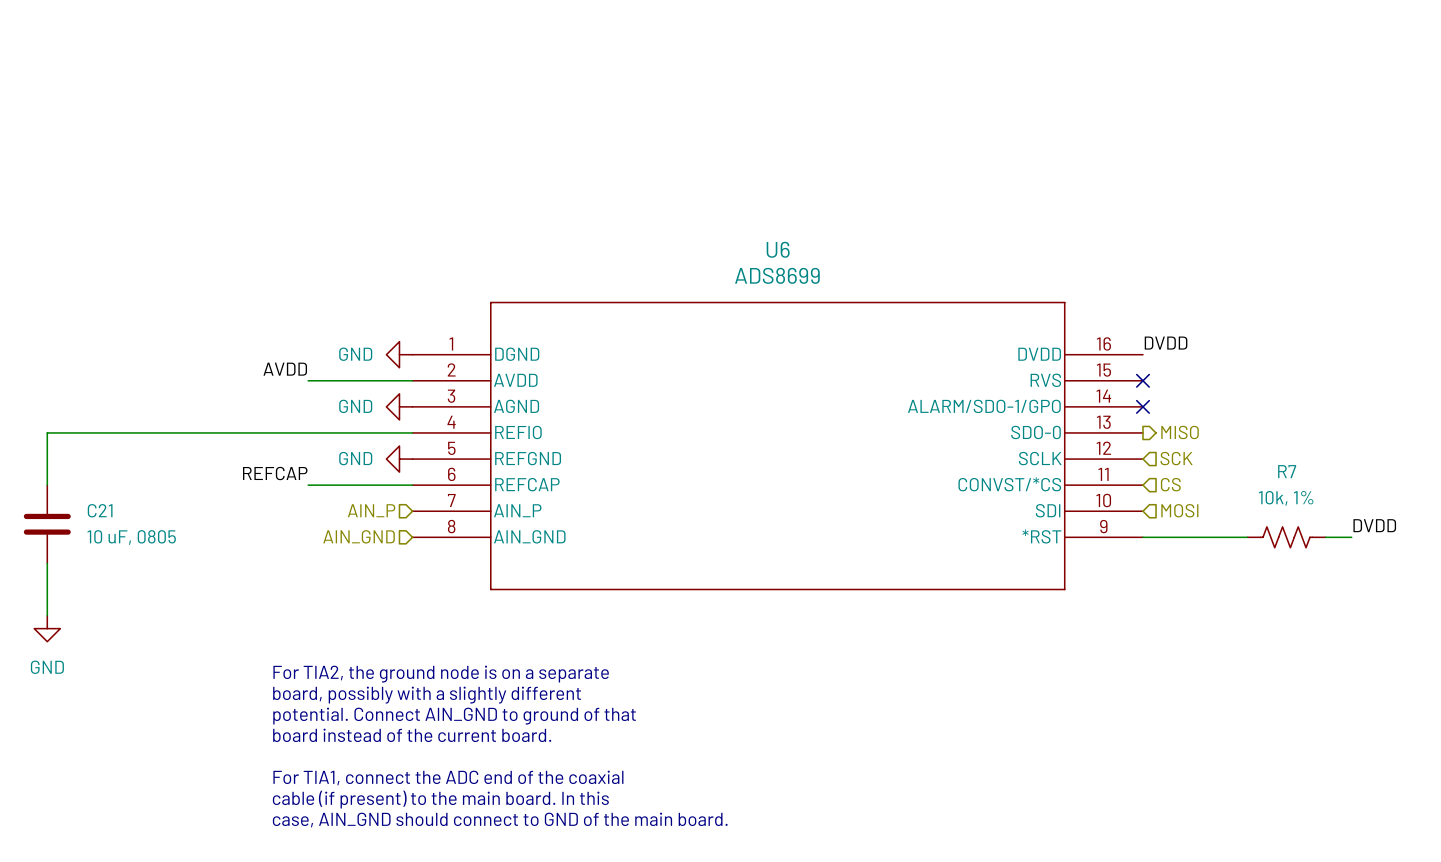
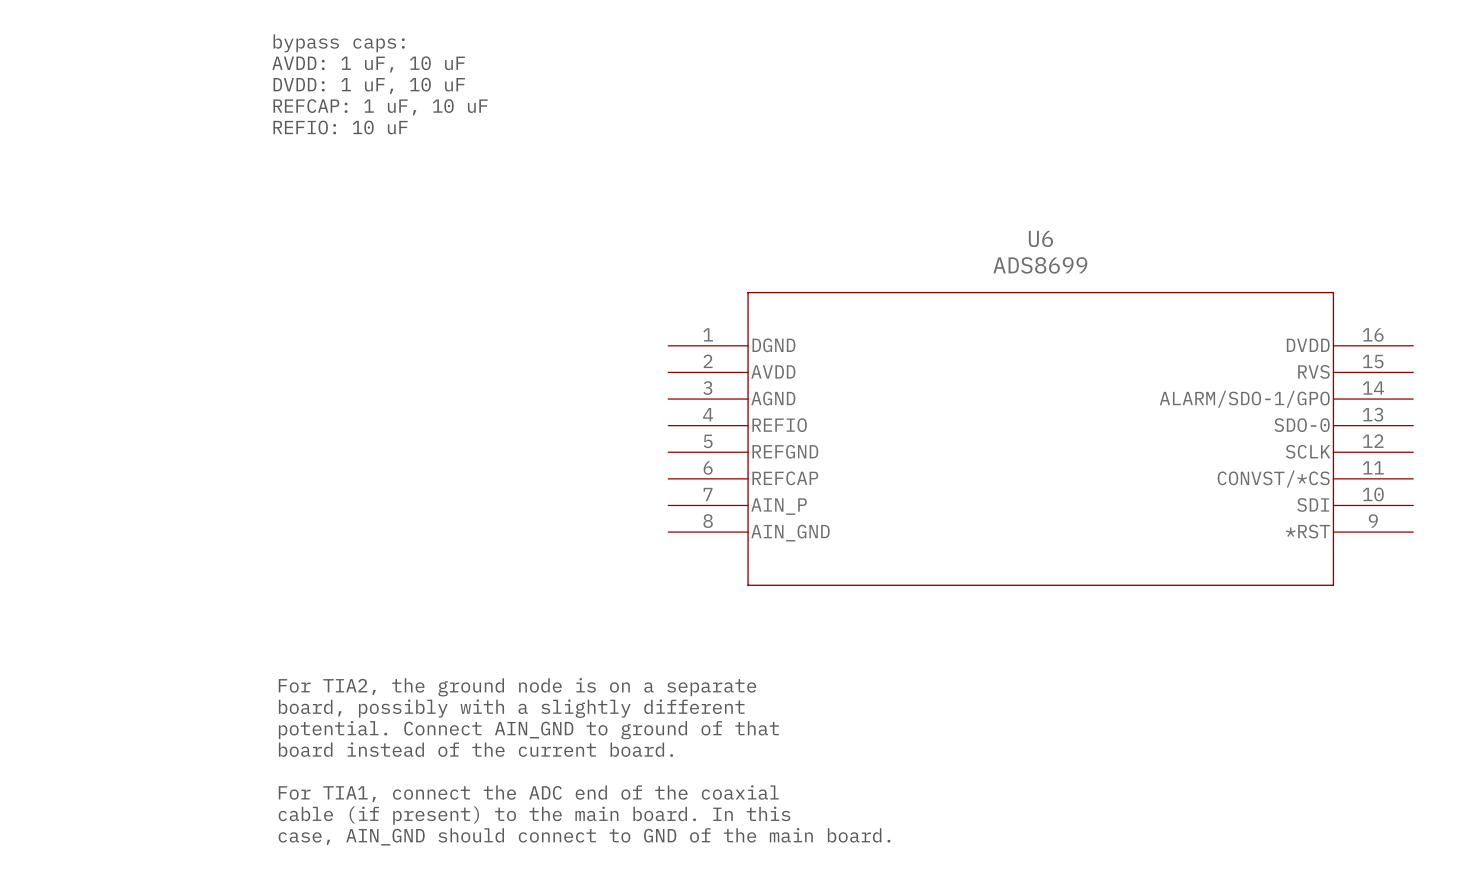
text: none -> bypass caps: (339, 43)
text: none -> AVDD: 1 uF, 10 uF (368, 64)
text: none -> DVDD: 1 uF, 10 uF (369, 85)
text: none -> REFCAP: 1 uF, 10 uF (380, 107)
text: none -> REFIO: 10 uF (340, 127)
label: DVDD (1166, 343) -> none
power symbol: GND (399, 354) -> none
label: AVDD (285, 369) -> none
wire: (308, 380) (412, 380) -> none
no-connect mark: (1142, 380) -> none
power symbol: GND (399, 406) -> none
no-connect mark: (1142, 406) -> none
wire: (412, 432) (47, 432) (47, 485) -> none
hierarchical label: MISO (1180, 432) -> none
U6 position: (777, 446) -> (1040, 438)
hierarchical label: SCK (1176, 458) -> none
power symbol: GND (399, 459) -> none
label: REFCAP (275, 473) -> none
hierarchical label: CS (1170, 484) -> none
wire: (308, 485) (412, 485) -> none
hierarchical label: AIN_P (371, 510) -> none
hierarchical label: MOSI (1179, 510) -> none
C21: 10 uF, 0805 (47, 524) -> none
label: DVDD (1374, 525) -> none
hierarchical label: AIN_GND (359, 536) -> none
wire: (1142, 537) (1247, 537) -> none
R7: 10k, 1% (1286, 537) -> none
wire: (1325, 537) (1351, 537) -> none
wire: (47, 563) (47, 615) -> none
power symbol: GND (47, 628) -> none

